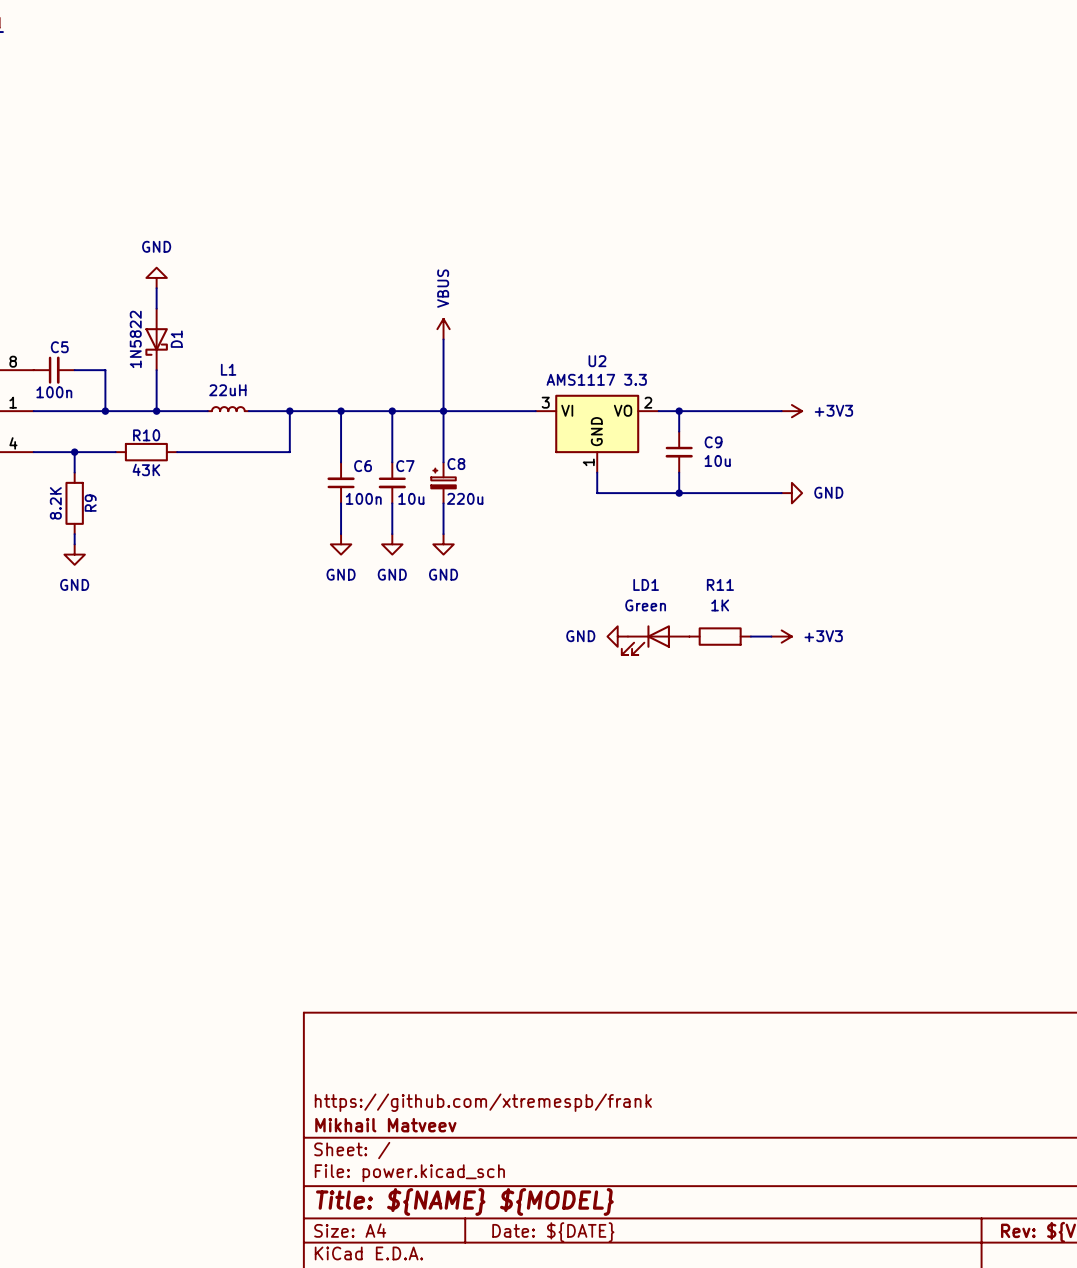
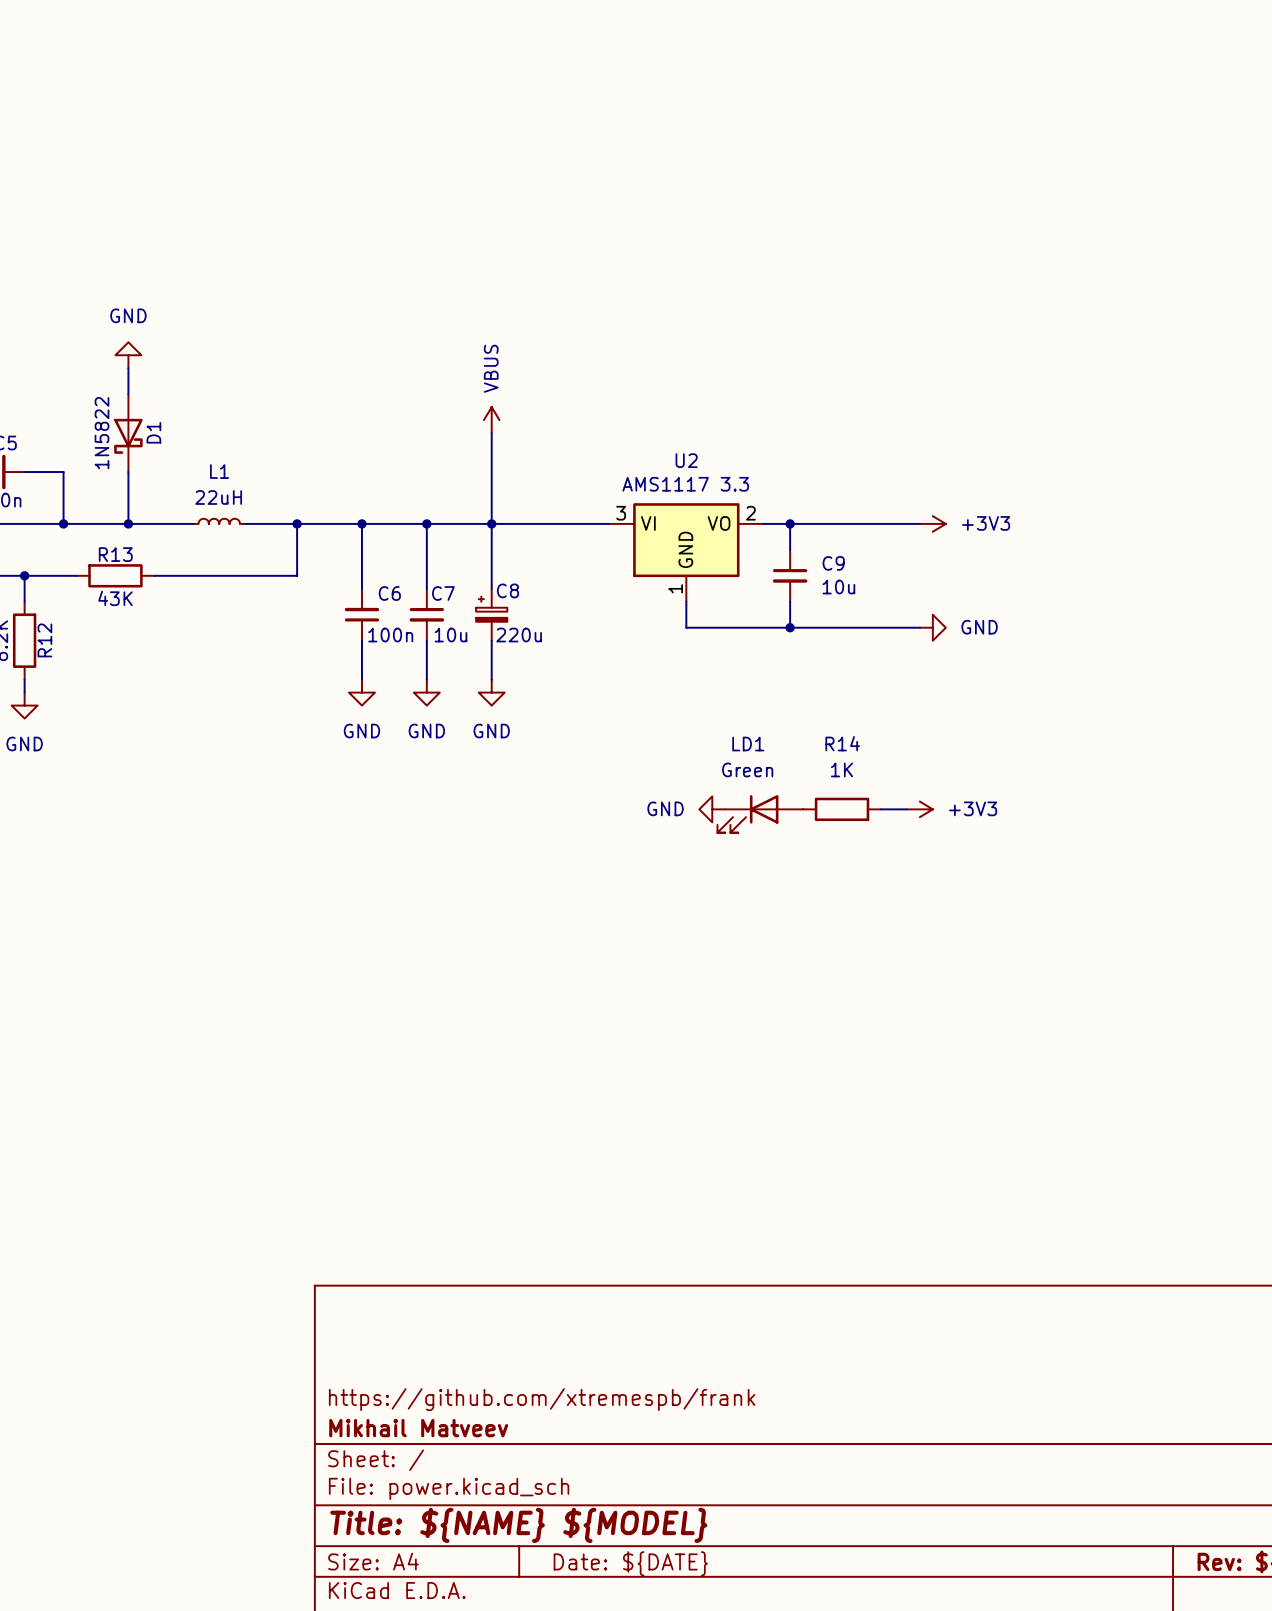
R10 name: R10 (146, 435) -> R13 (115, 554)
R9 name: R9 (90, 503) -> R12 (44, 640)
R11 name: R11 (720, 584) -> R14 (842, 743)

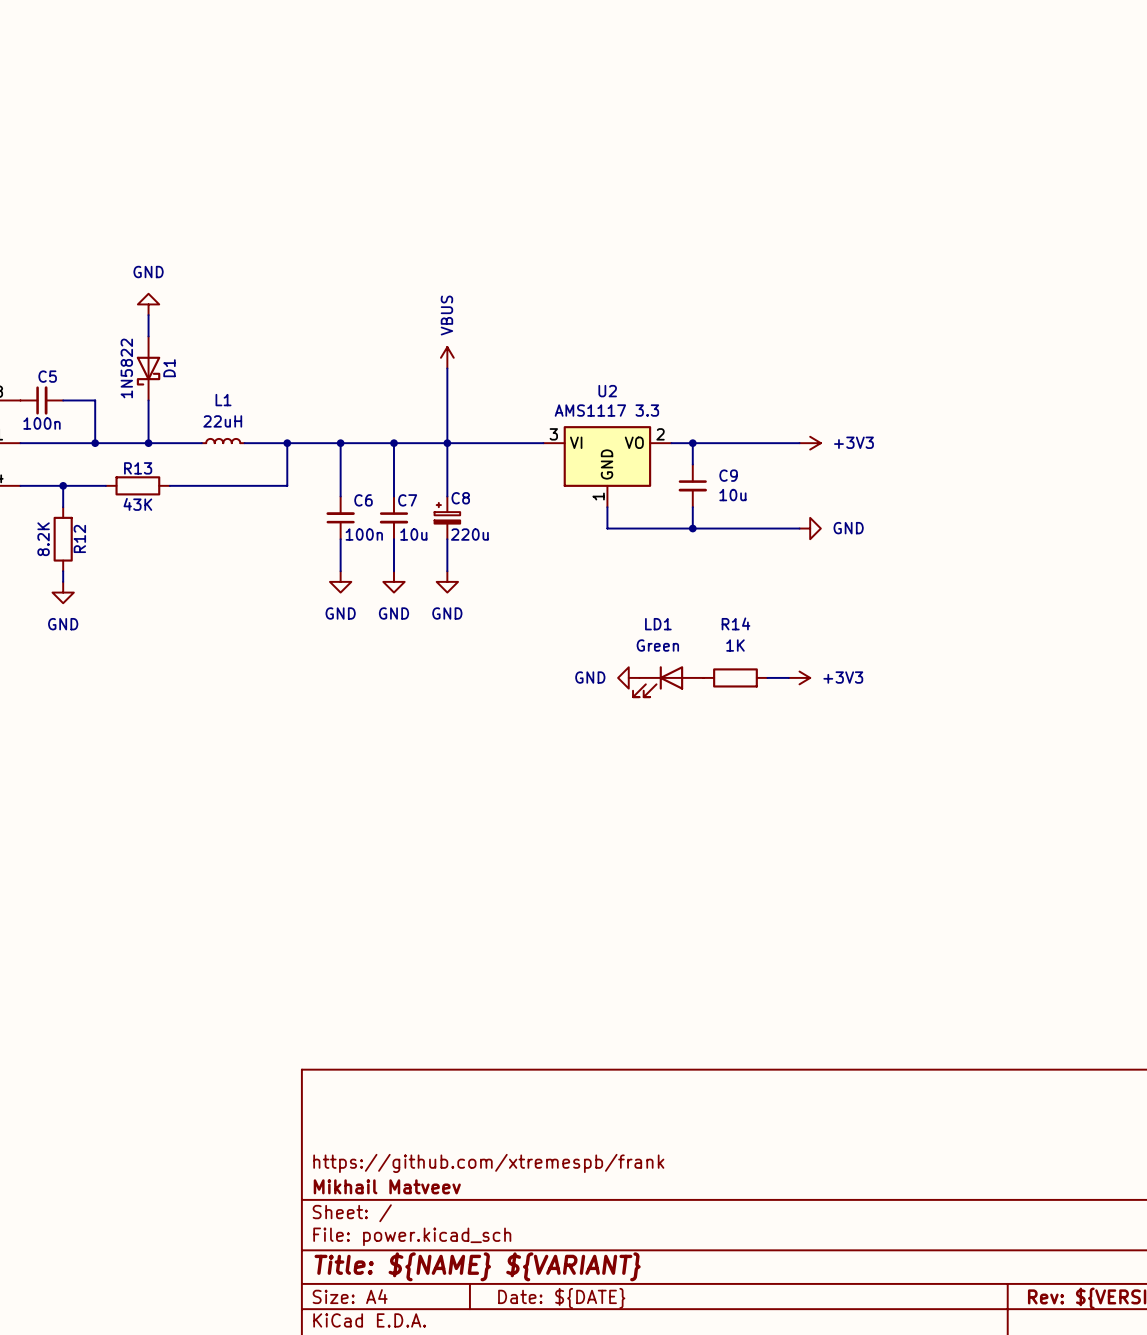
title block: Title: ${NAME} ${MODEL} (518, 1525) -> Title: ${NAME} ${VARIANT} (477, 1266)

